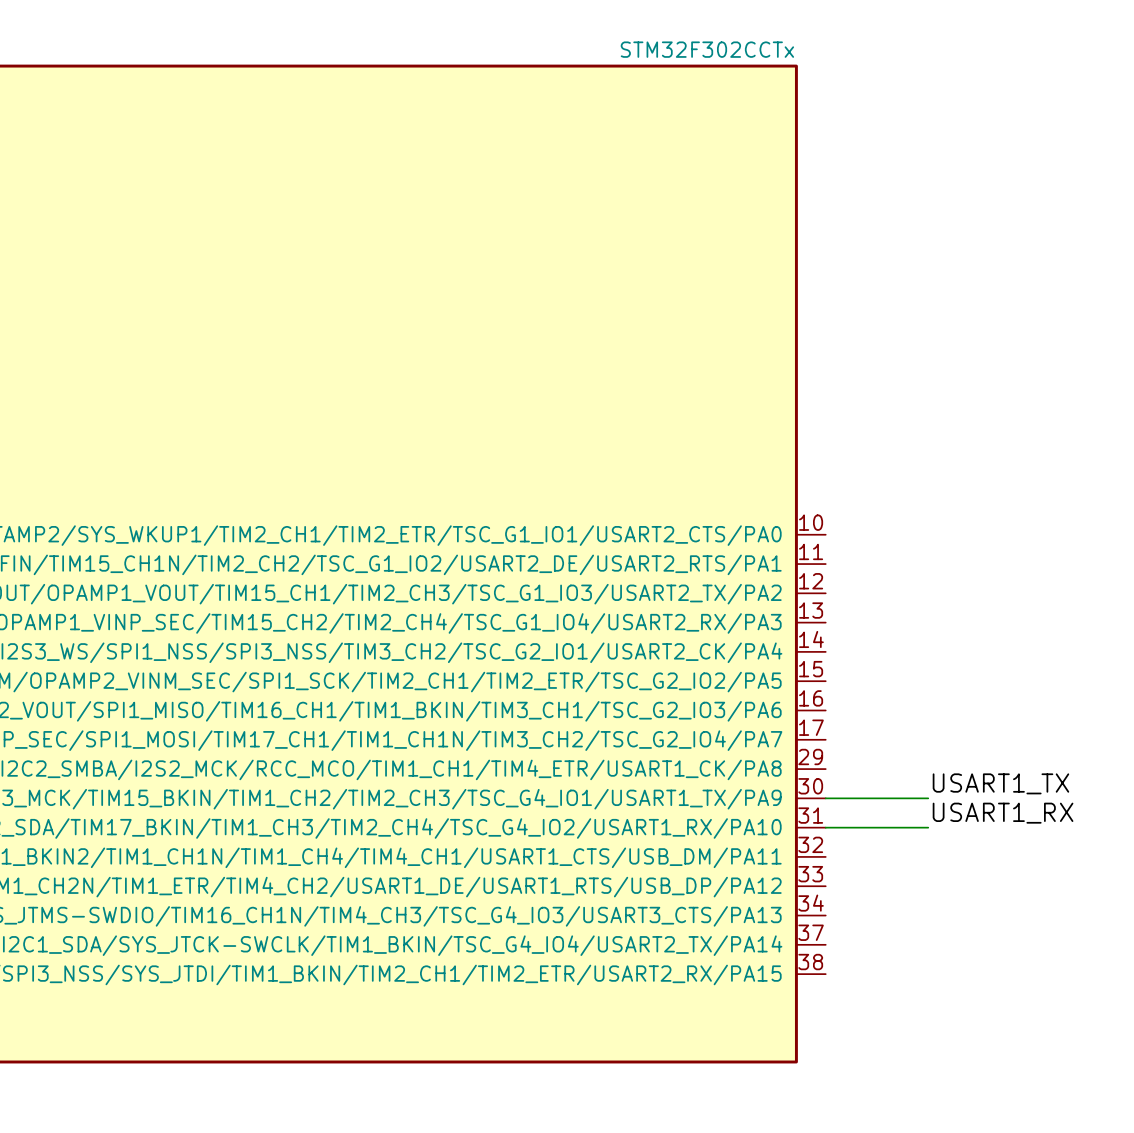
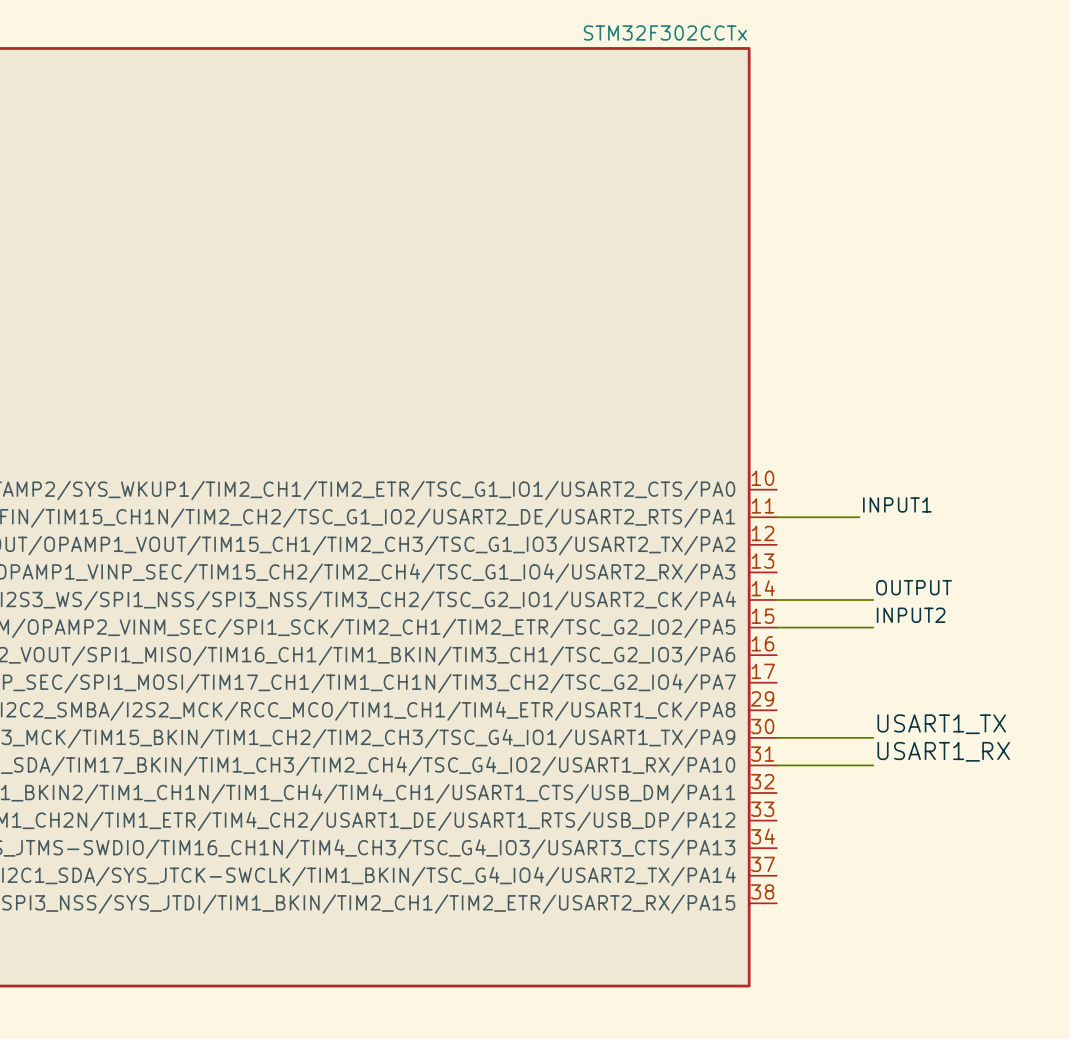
label: none -> INPUT1 (897, 504)
wire: none -> (776, 517) (859, 517)
label: none -> OUTPUT (914, 587)
wire: none -> (776, 599) (873, 599)
label: none -> INPUT2 (911, 615)
wire: none -> (776, 627) (873, 627)

